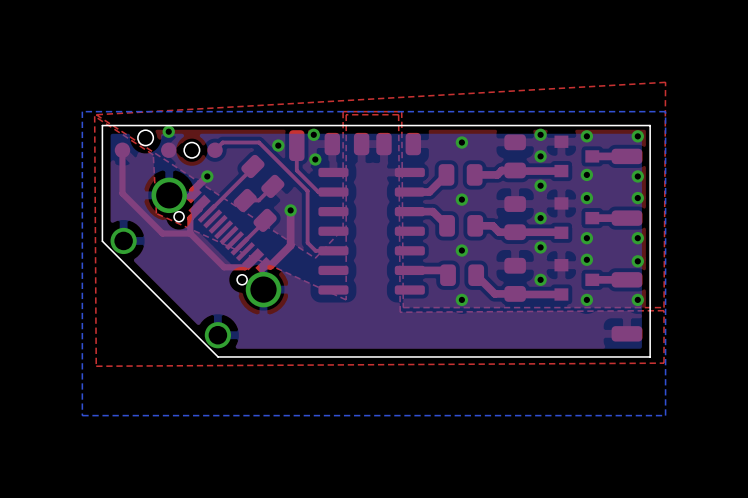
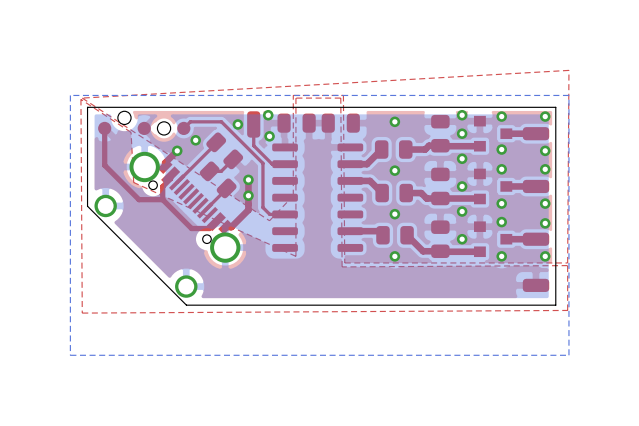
via position: (168, 131) -> (195, 140)
via: none -> (248, 195)

